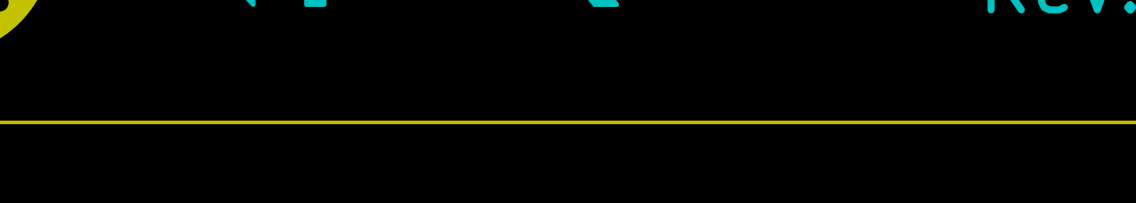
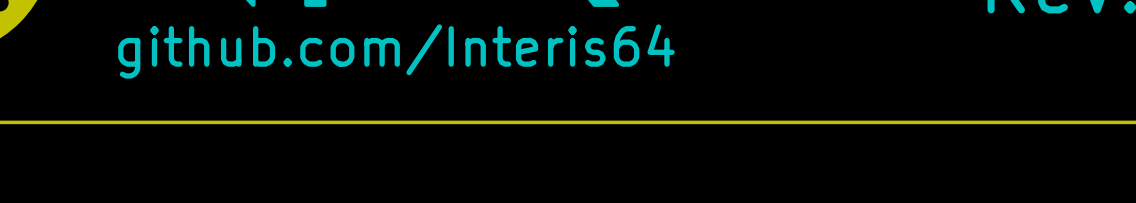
text: none -> github.com/Interis64 (396, 51)

